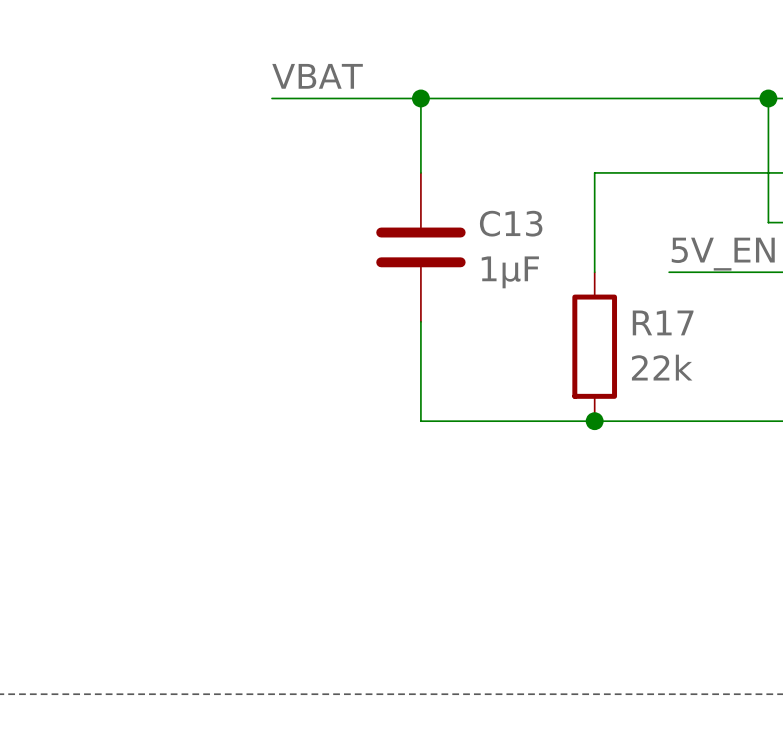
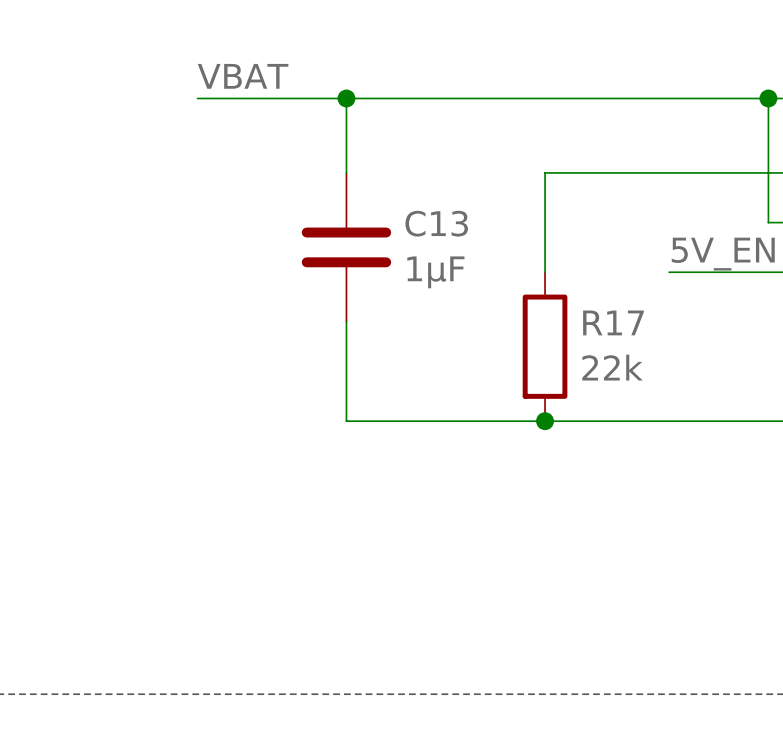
label position: VBAT (317, 76) -> VBAT (243, 76)
wire: none -> (197, 98) (271, 98)
wire: (420, 98) (420, 172) -> (346, 98) (346, 172)
junction position: (420, 98) -> (346, 98)
wire: (594, 172) (594, 272) -> (594, 172) (545, 172) (545, 272)
C13 position: (420, 247) -> (346, 247)
wire: (420, 321) (420, 421) -> (346, 321) (346, 421) (420, 421)
R17 position: (594, 346) -> (545, 346)
junction position: (594, 421) -> (545, 421)

